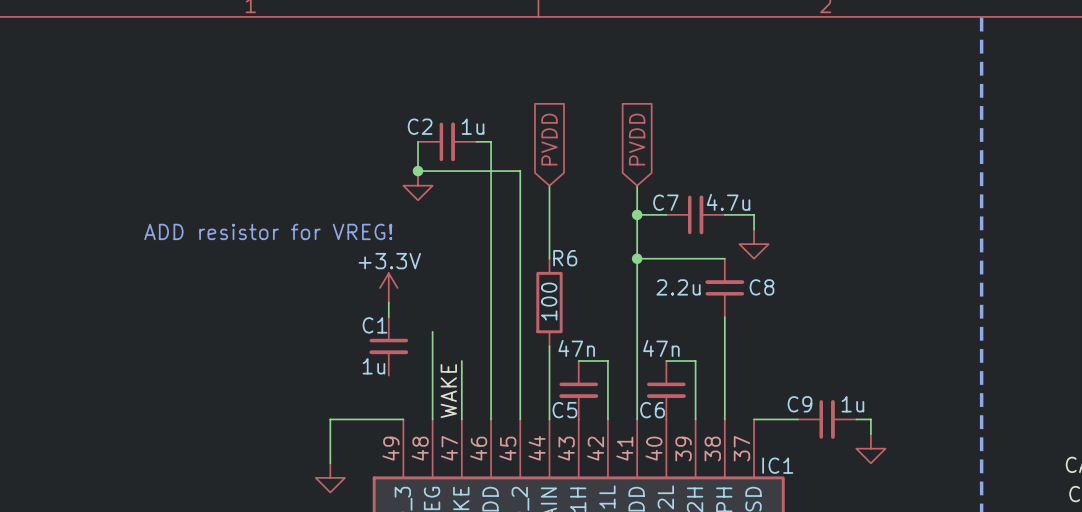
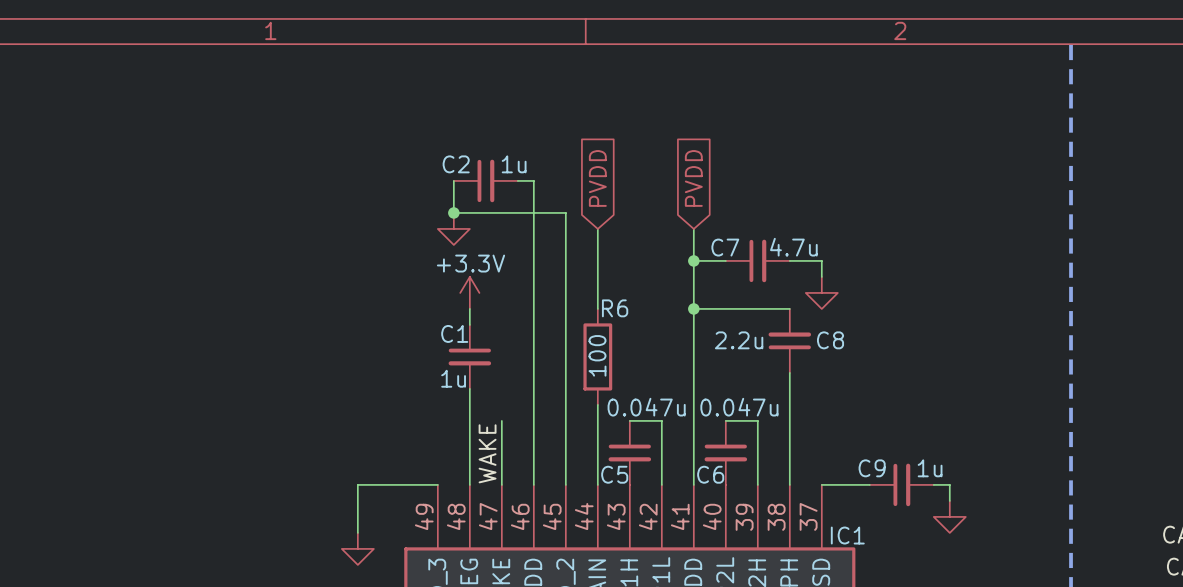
text: ADD resistor for VREG! (268, 231) -> none
power symbol position: +3.3V (388, 287) -> +3.3V (469, 292)
wire: (388, 302) (388, 317) -> (469, 308) (469, 324)
C1 position: (388, 346) -> (469, 356)
C5 value: 47n (576, 348) -> 0.047u (646, 407)
C6 value: 47n (661, 348) -> 0.047u (739, 407)

